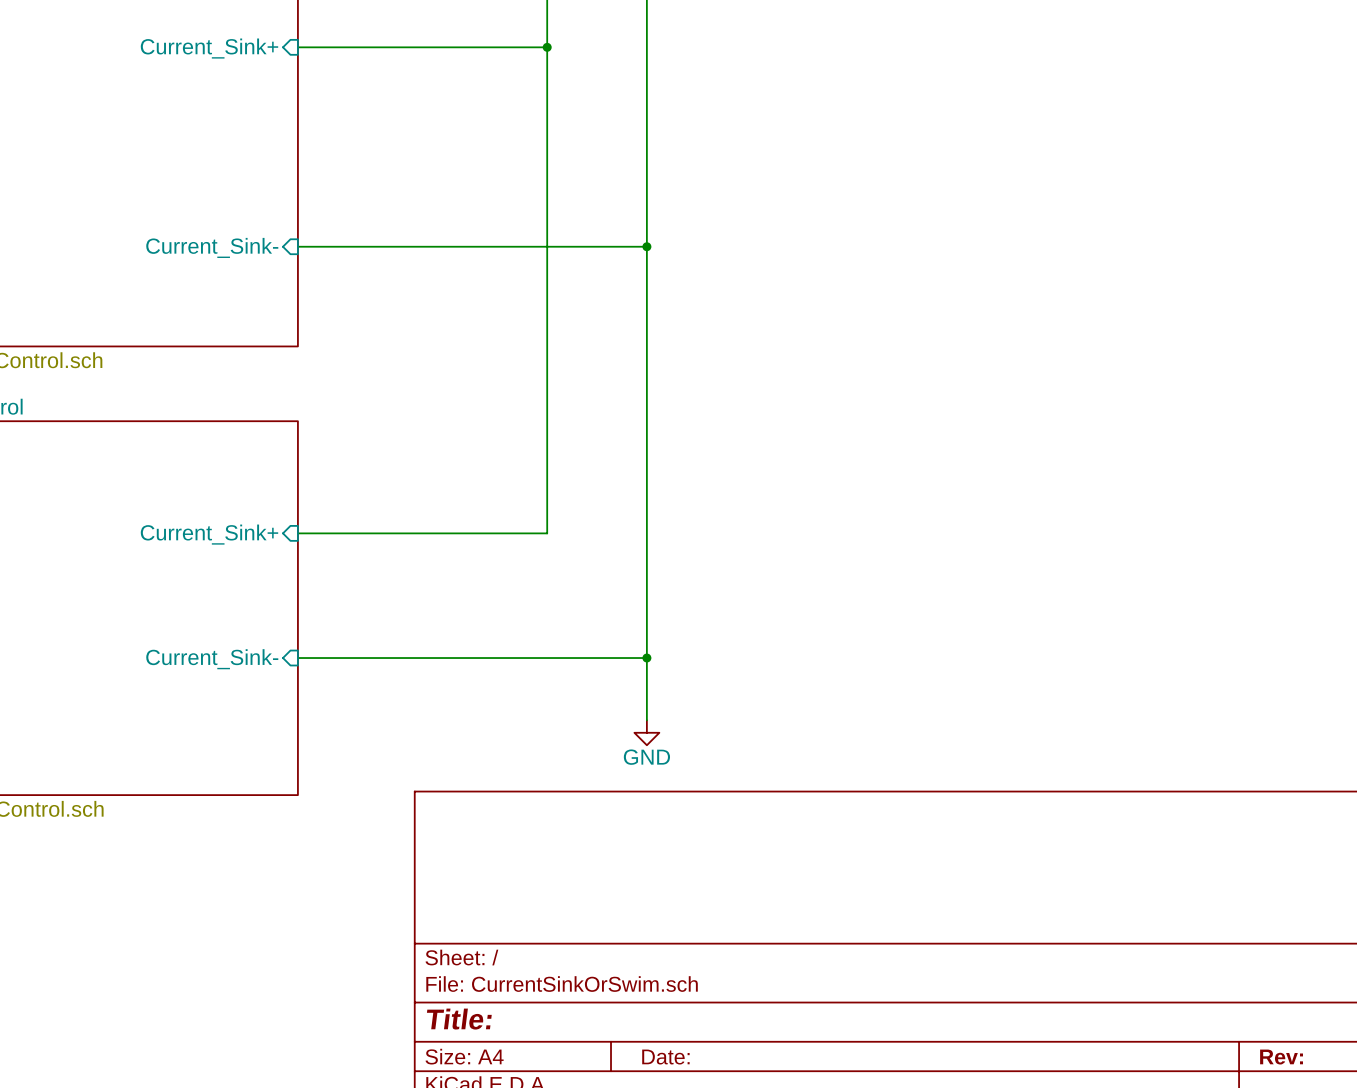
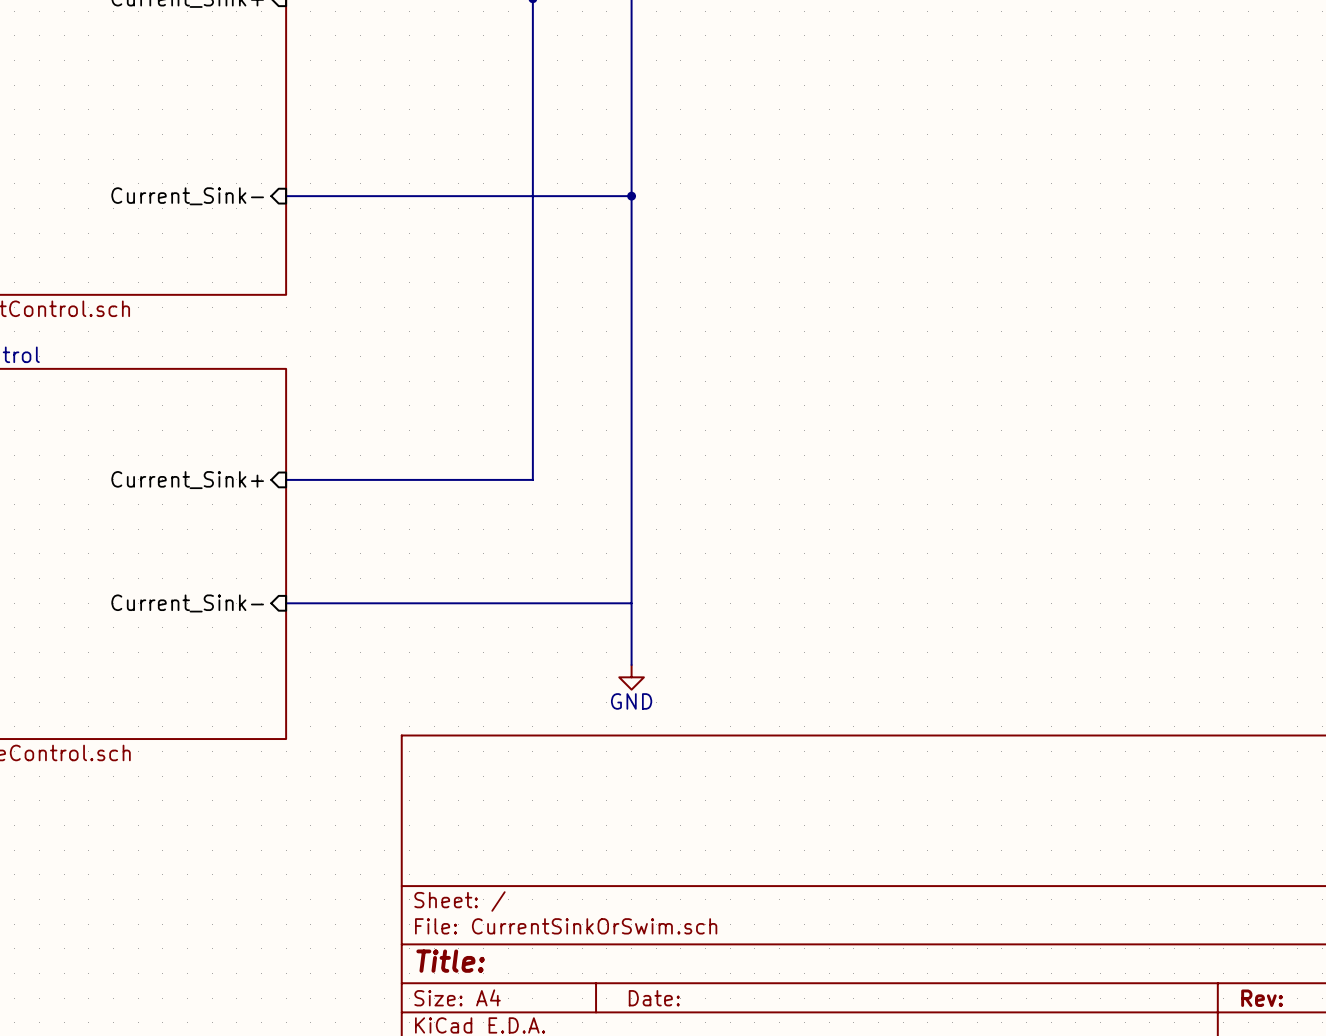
junction: (646, 658) -> none

